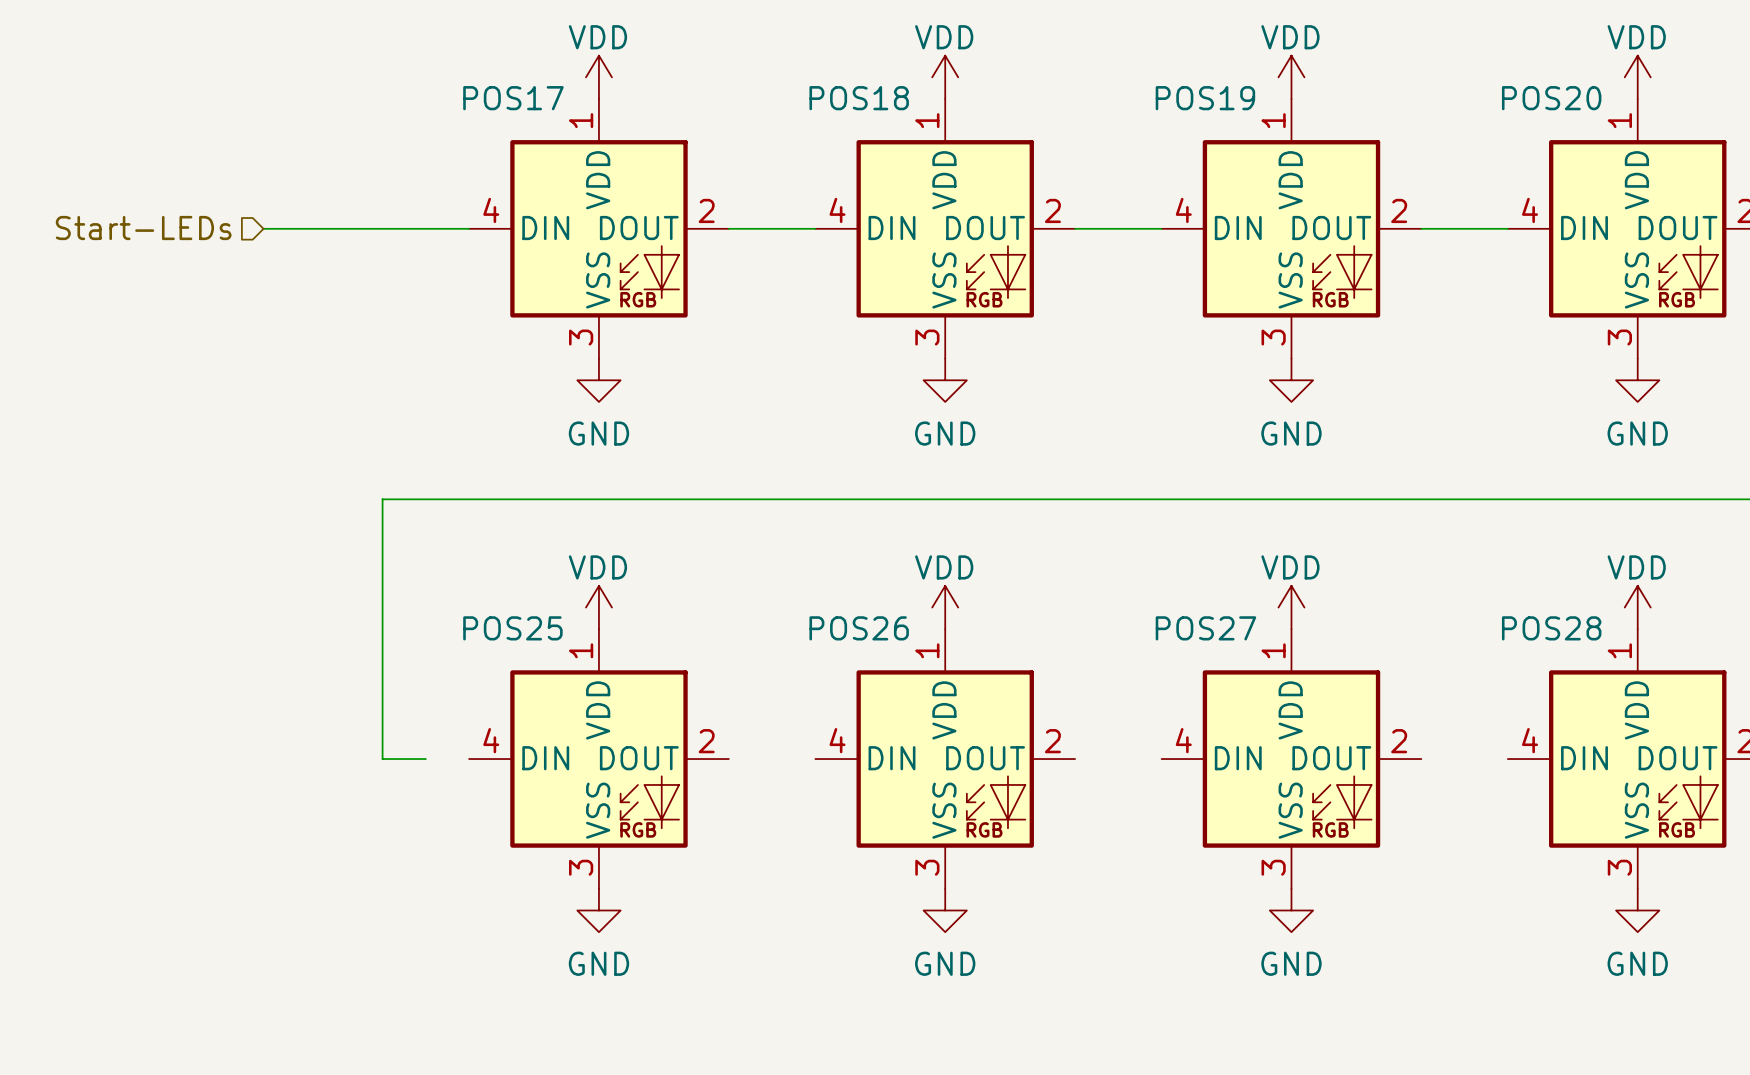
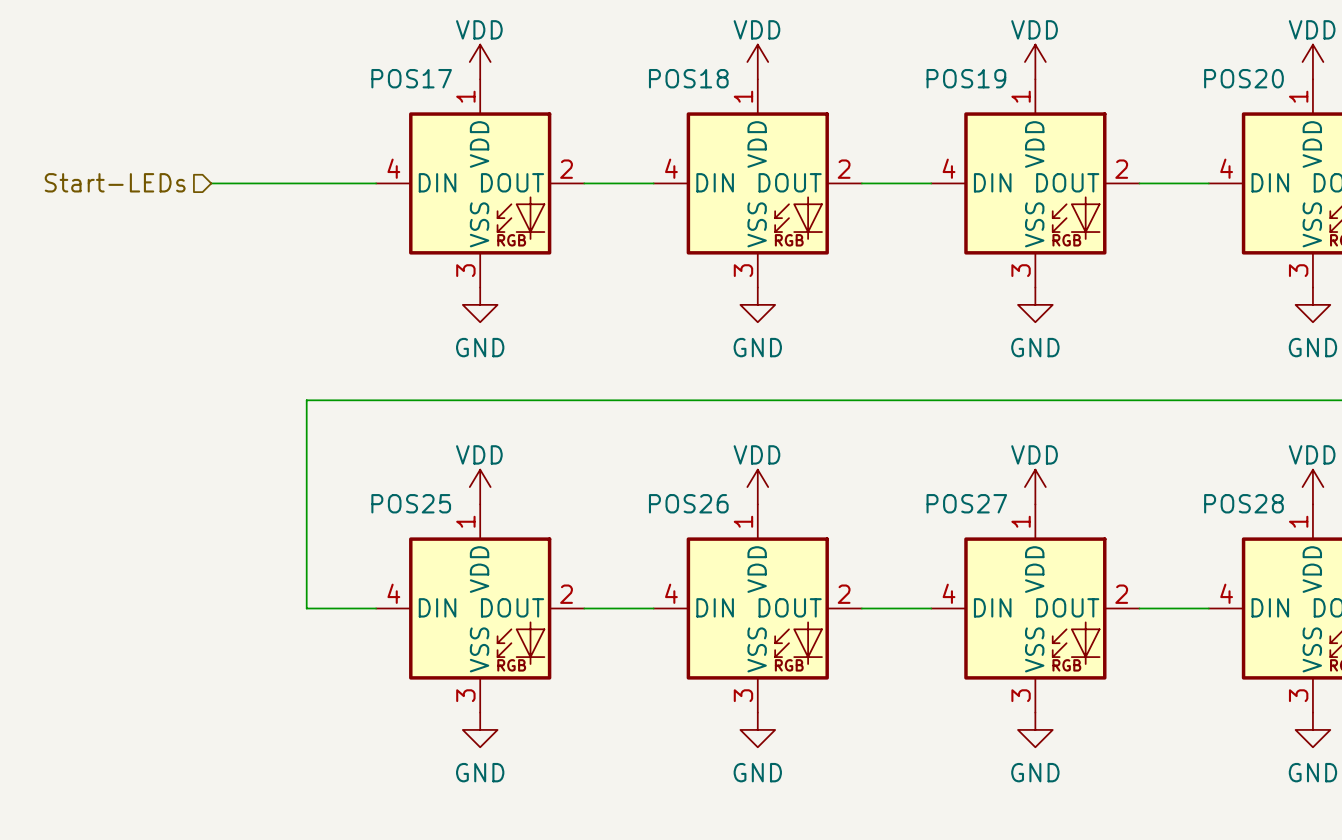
wire: none -> (341, 608) (376, 608)
wire: none -> (584, 608) (653, 608)
wire: none -> (861, 608) (931, 608)
wire: none -> (1139, 608) (1208, 608)

